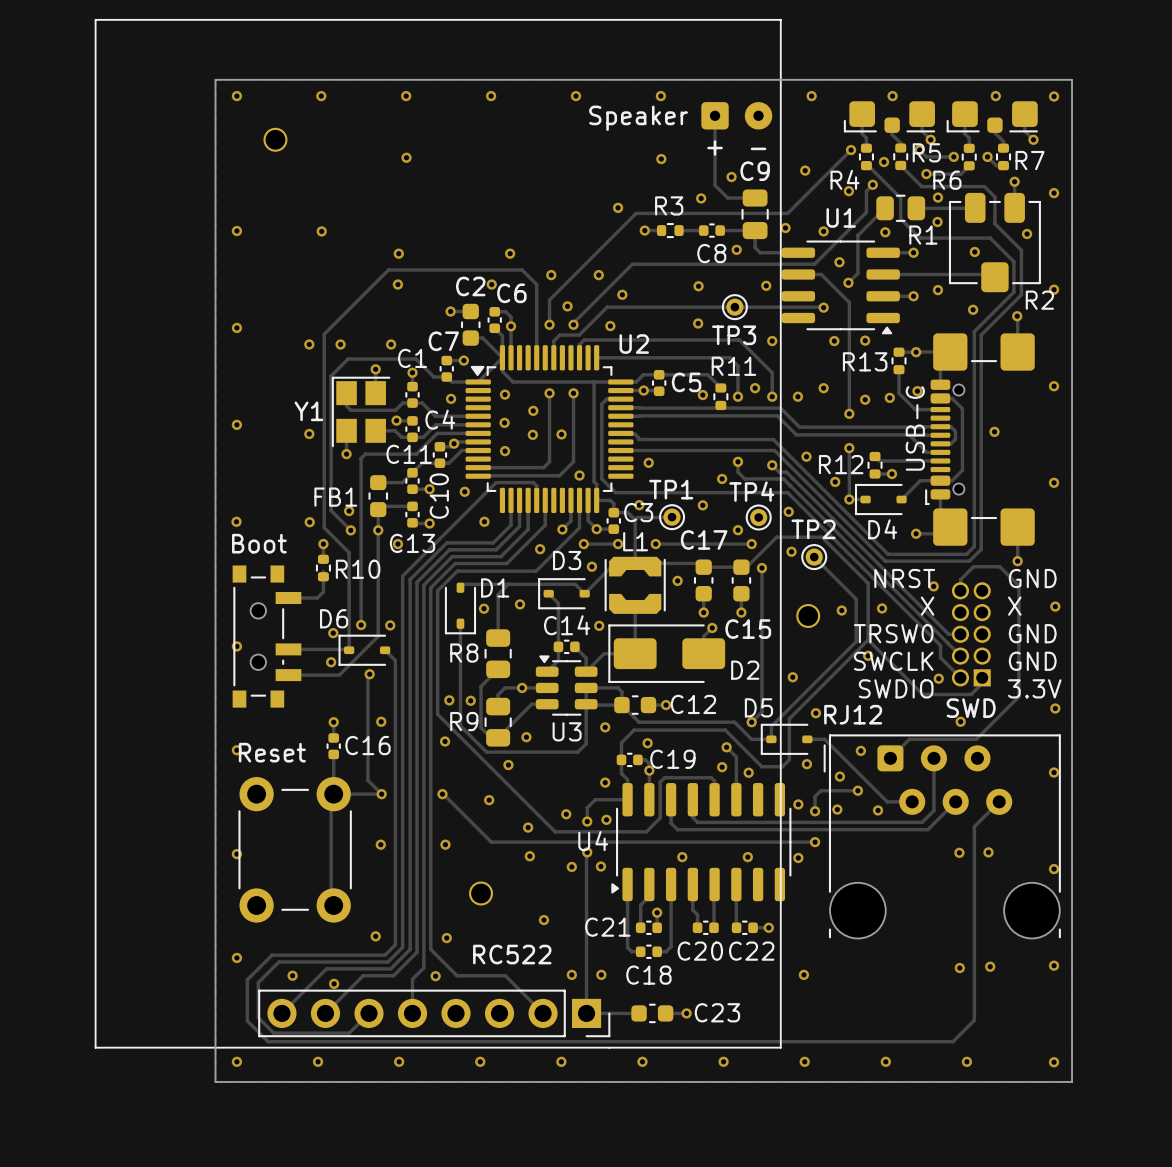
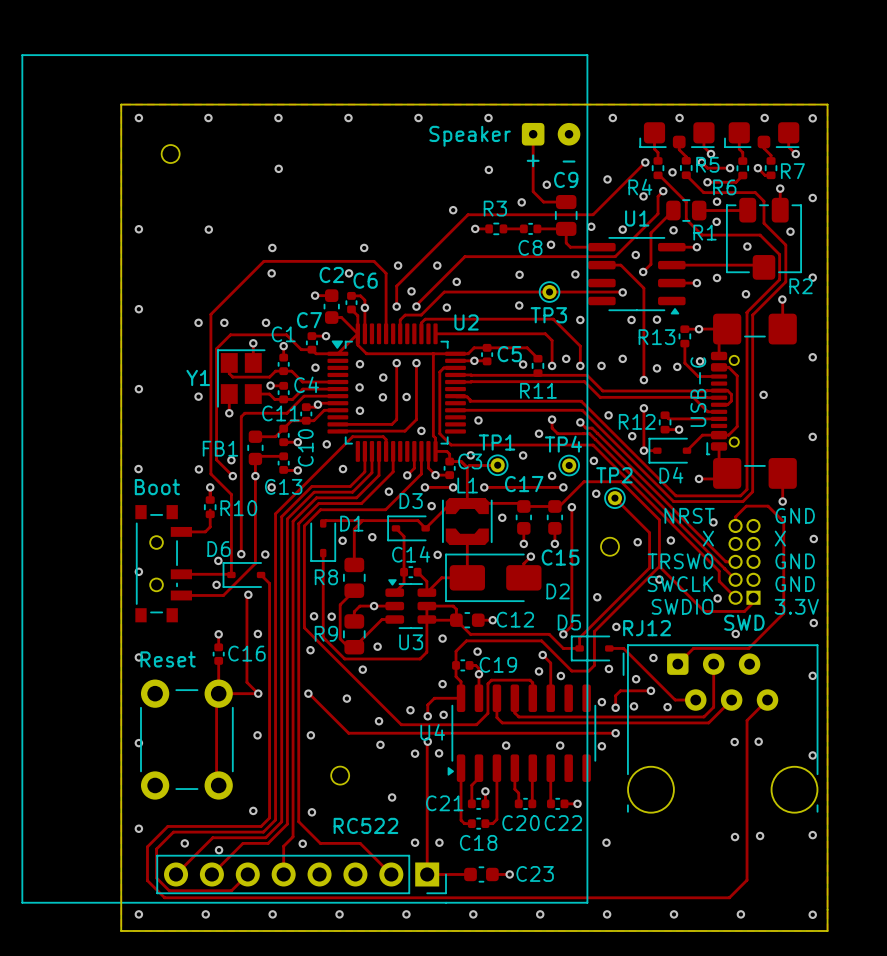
R11 name position: R11 (733, 366) -> R11 (538, 390)

